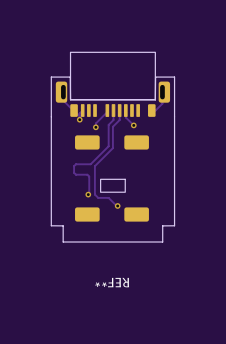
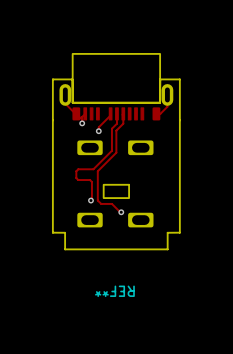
part footprint: [55, 51, 171, 117] -> [59, 53, 174, 121]
track: (125, 110) (125, 117) (133, 125) -> none
via: (133, 125) -> none
REF** footprint: [75, 135, 149, 222] -> [77, 140, 154, 228]

